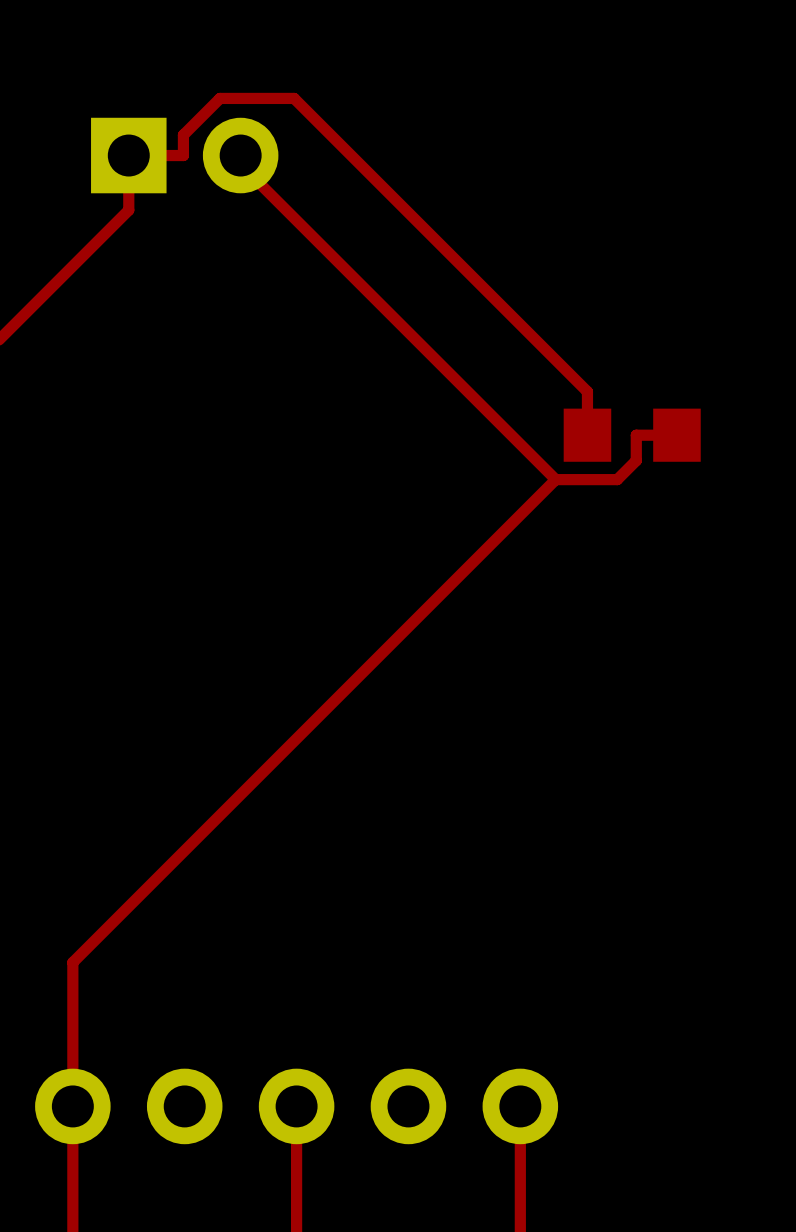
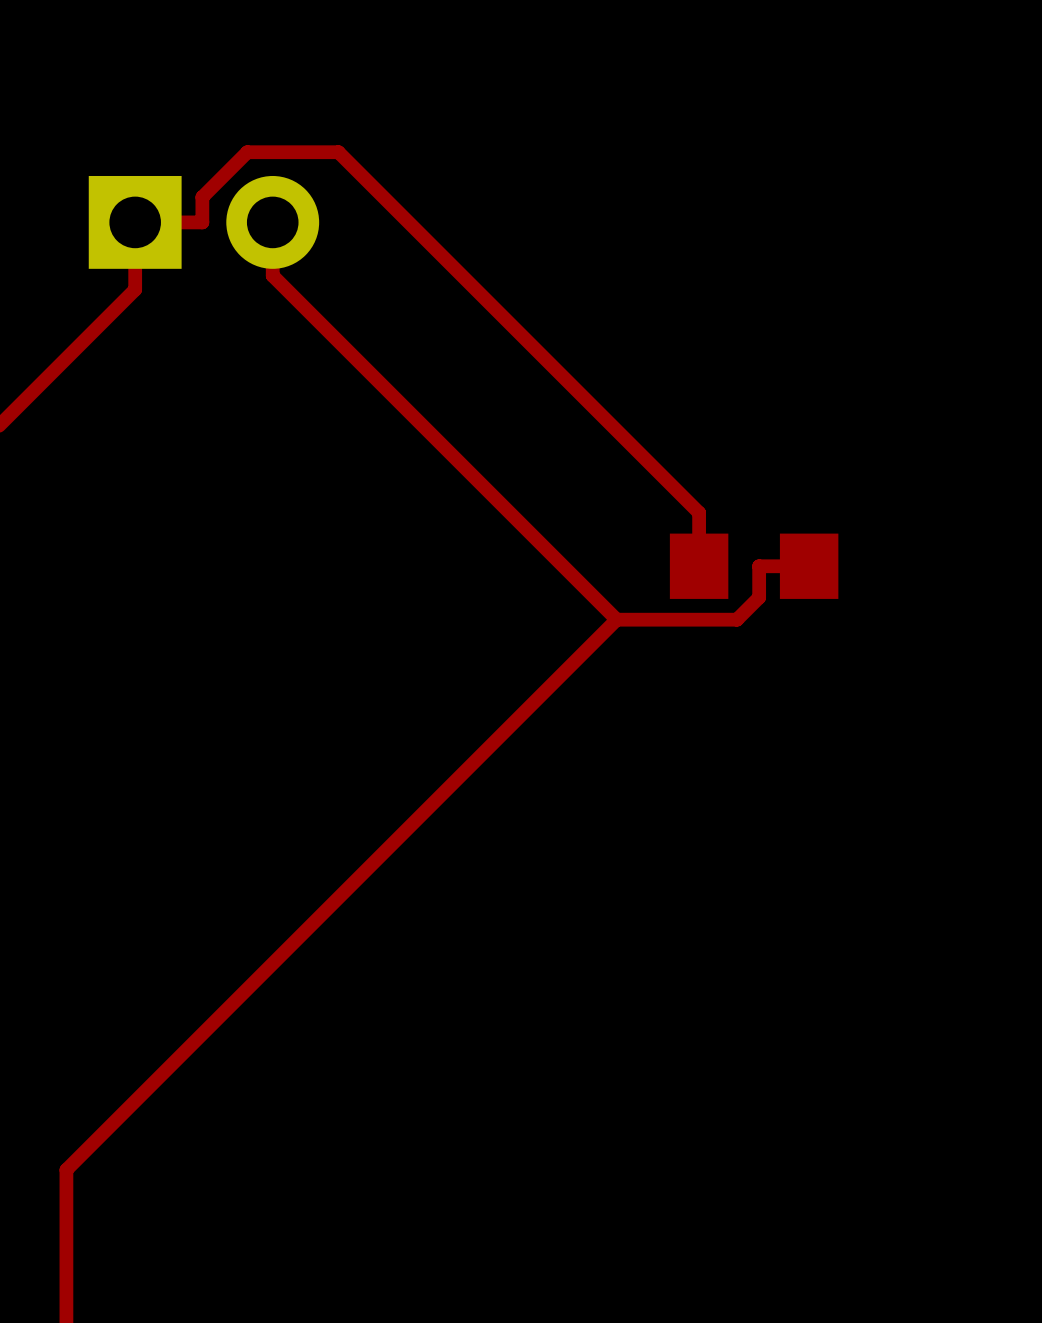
track: (240, 164) (555, 479) -> (272, 233) (272, 275) (616, 619)
track: (618, 478) (555, 479) -> (736, 619) (616, 619)
track: (555, 479) (72, 962) -> (616, 619) (66, 1169) (66, 1214)

